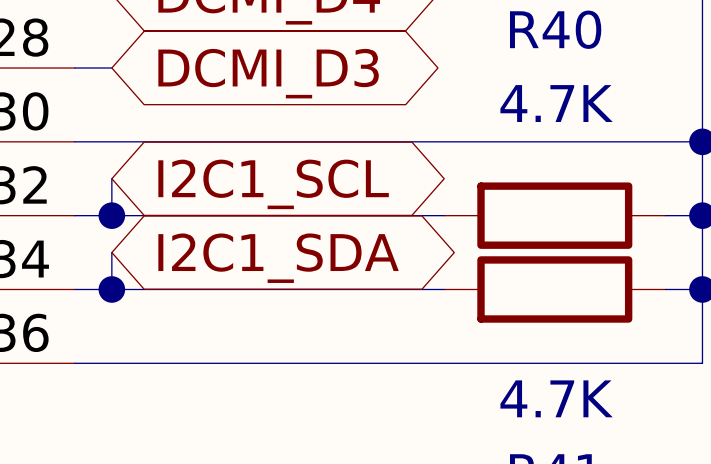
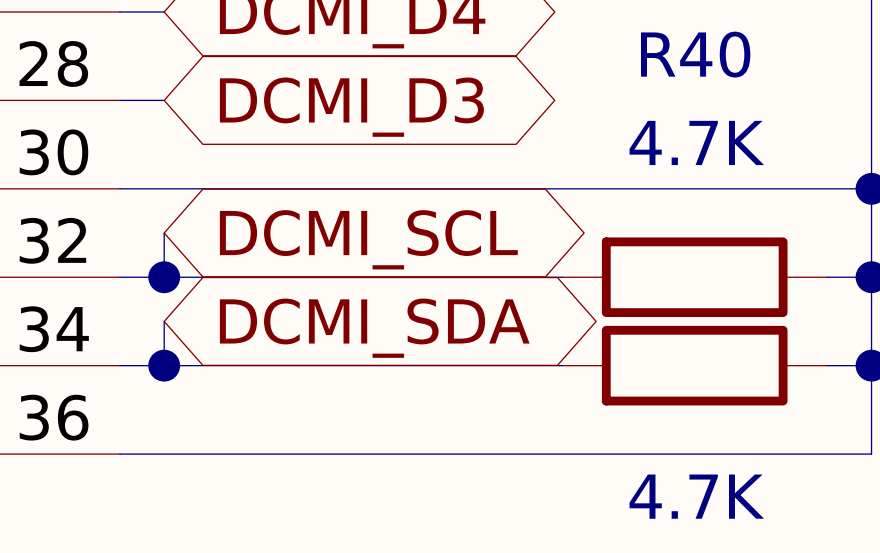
global label: I2C1_SCL (273, 184) -> DCMI_SCL (368, 239)
global label: I2C1_SDA (278, 258) -> DCMI_SDA (374, 328)

